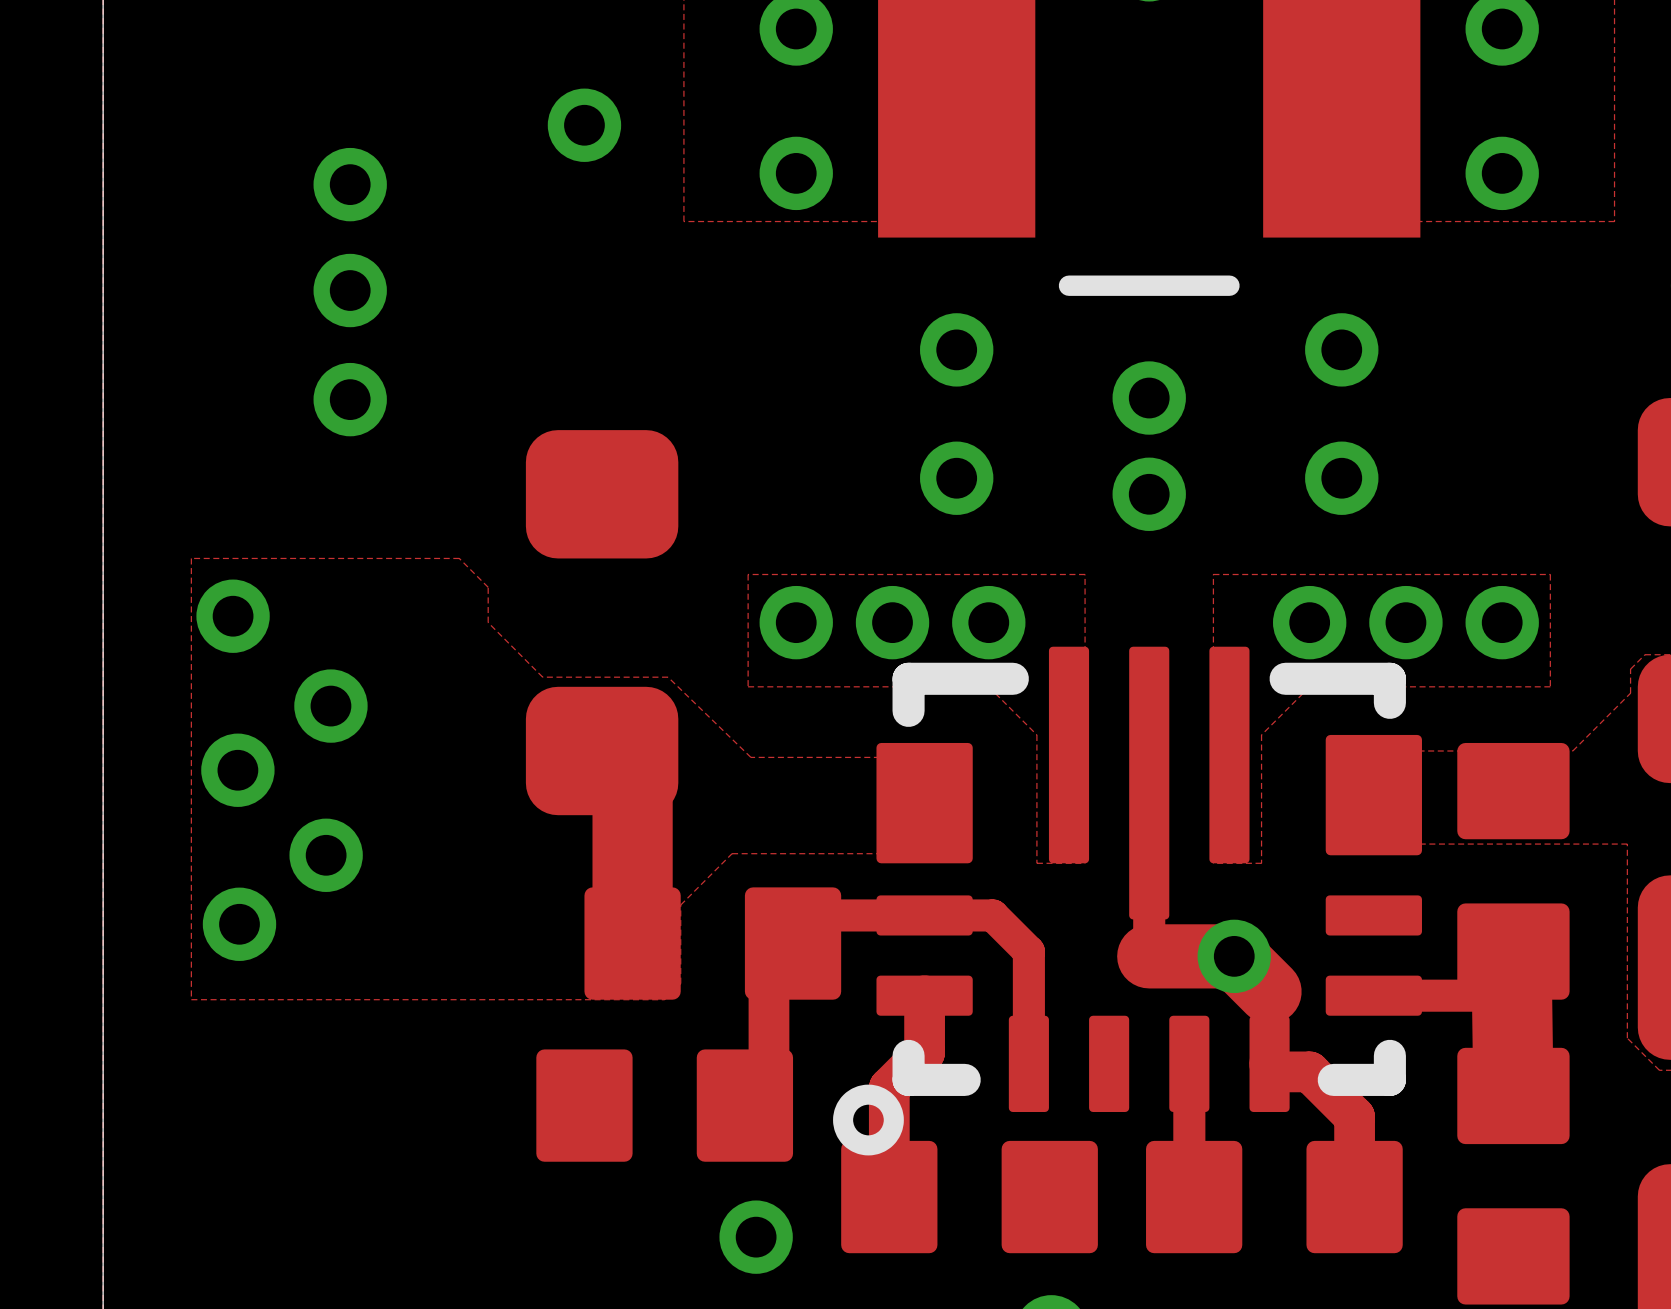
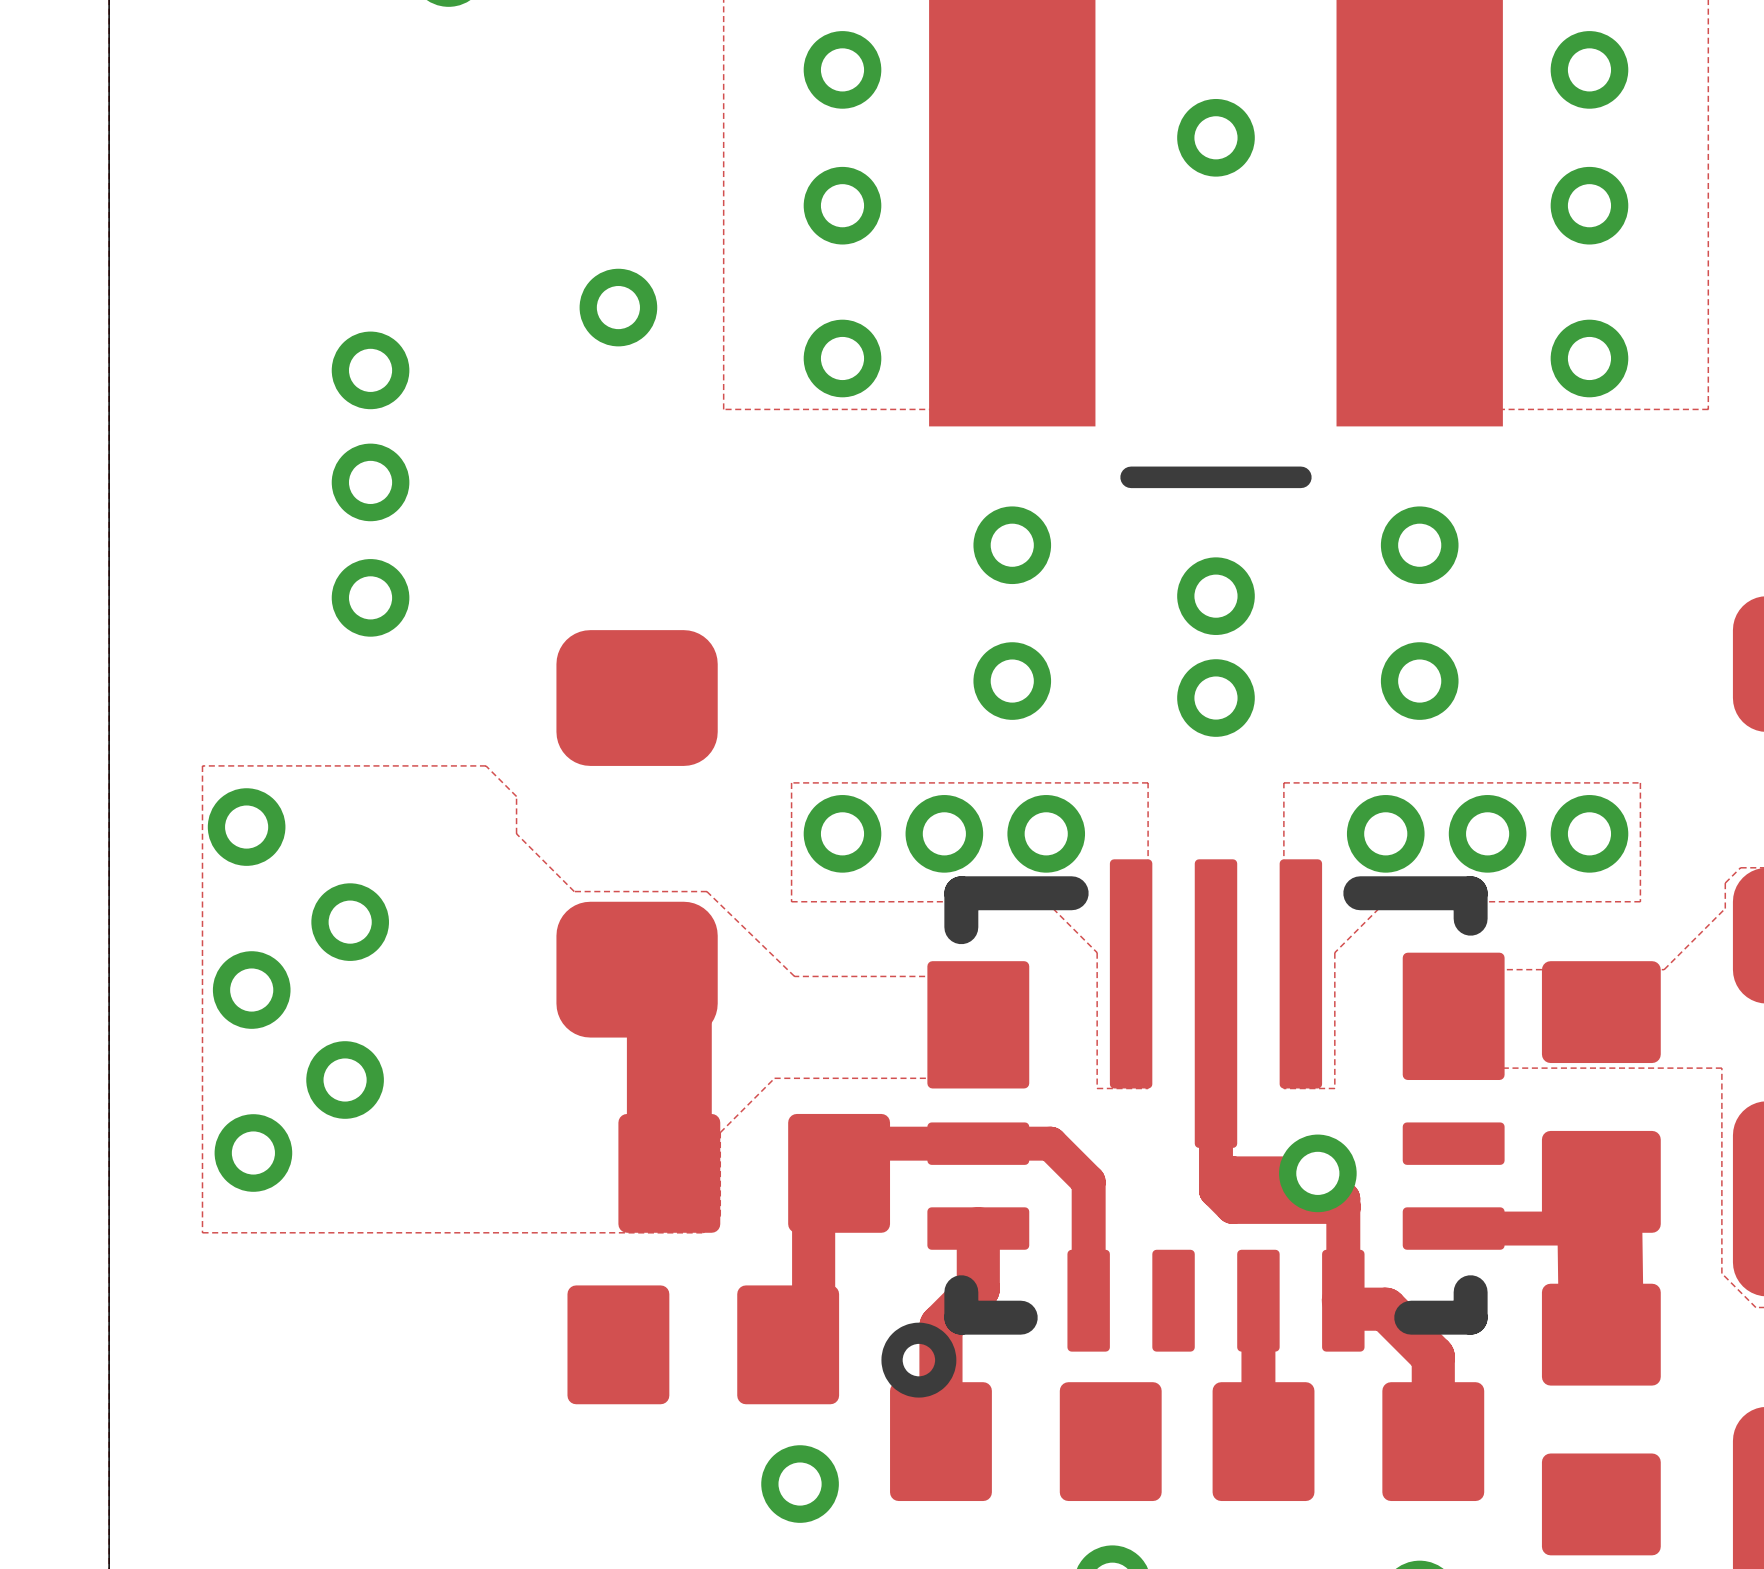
track: (1149, 956) (1234, 956) (1269, 991) -> (1343, 1206) (1232, 1206) (1215, 1190) (1232, 1173) (1317, 1173) (1343, 1198) (1343, 1224)
via position: (1234, 956) -> (1317, 1173)

